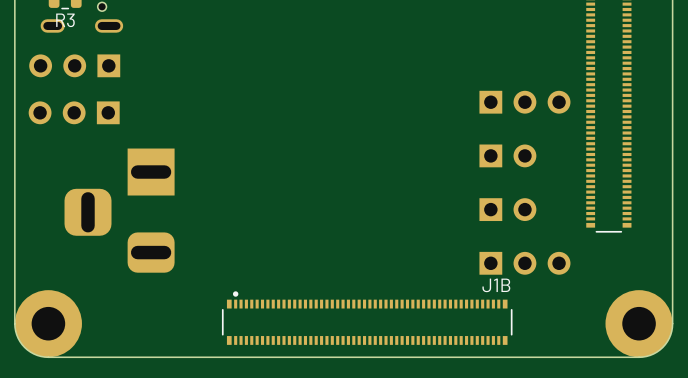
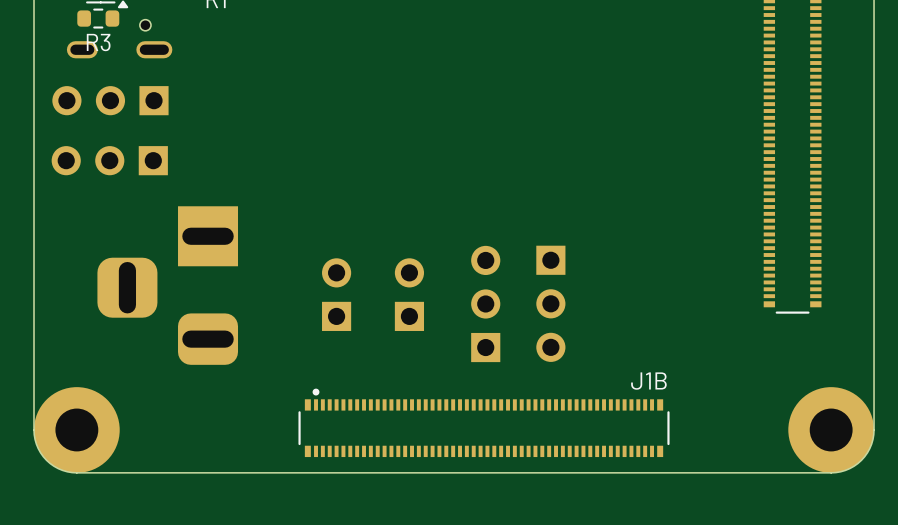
part: (524, 102) -> none
part: (507, 155) -> none
part: (507, 209) -> none
part: none -> (336, 294)
part: none -> (409, 294)
part: none -> (550, 303)
part: none -> (485, 303)
part: (524, 263) -> none

